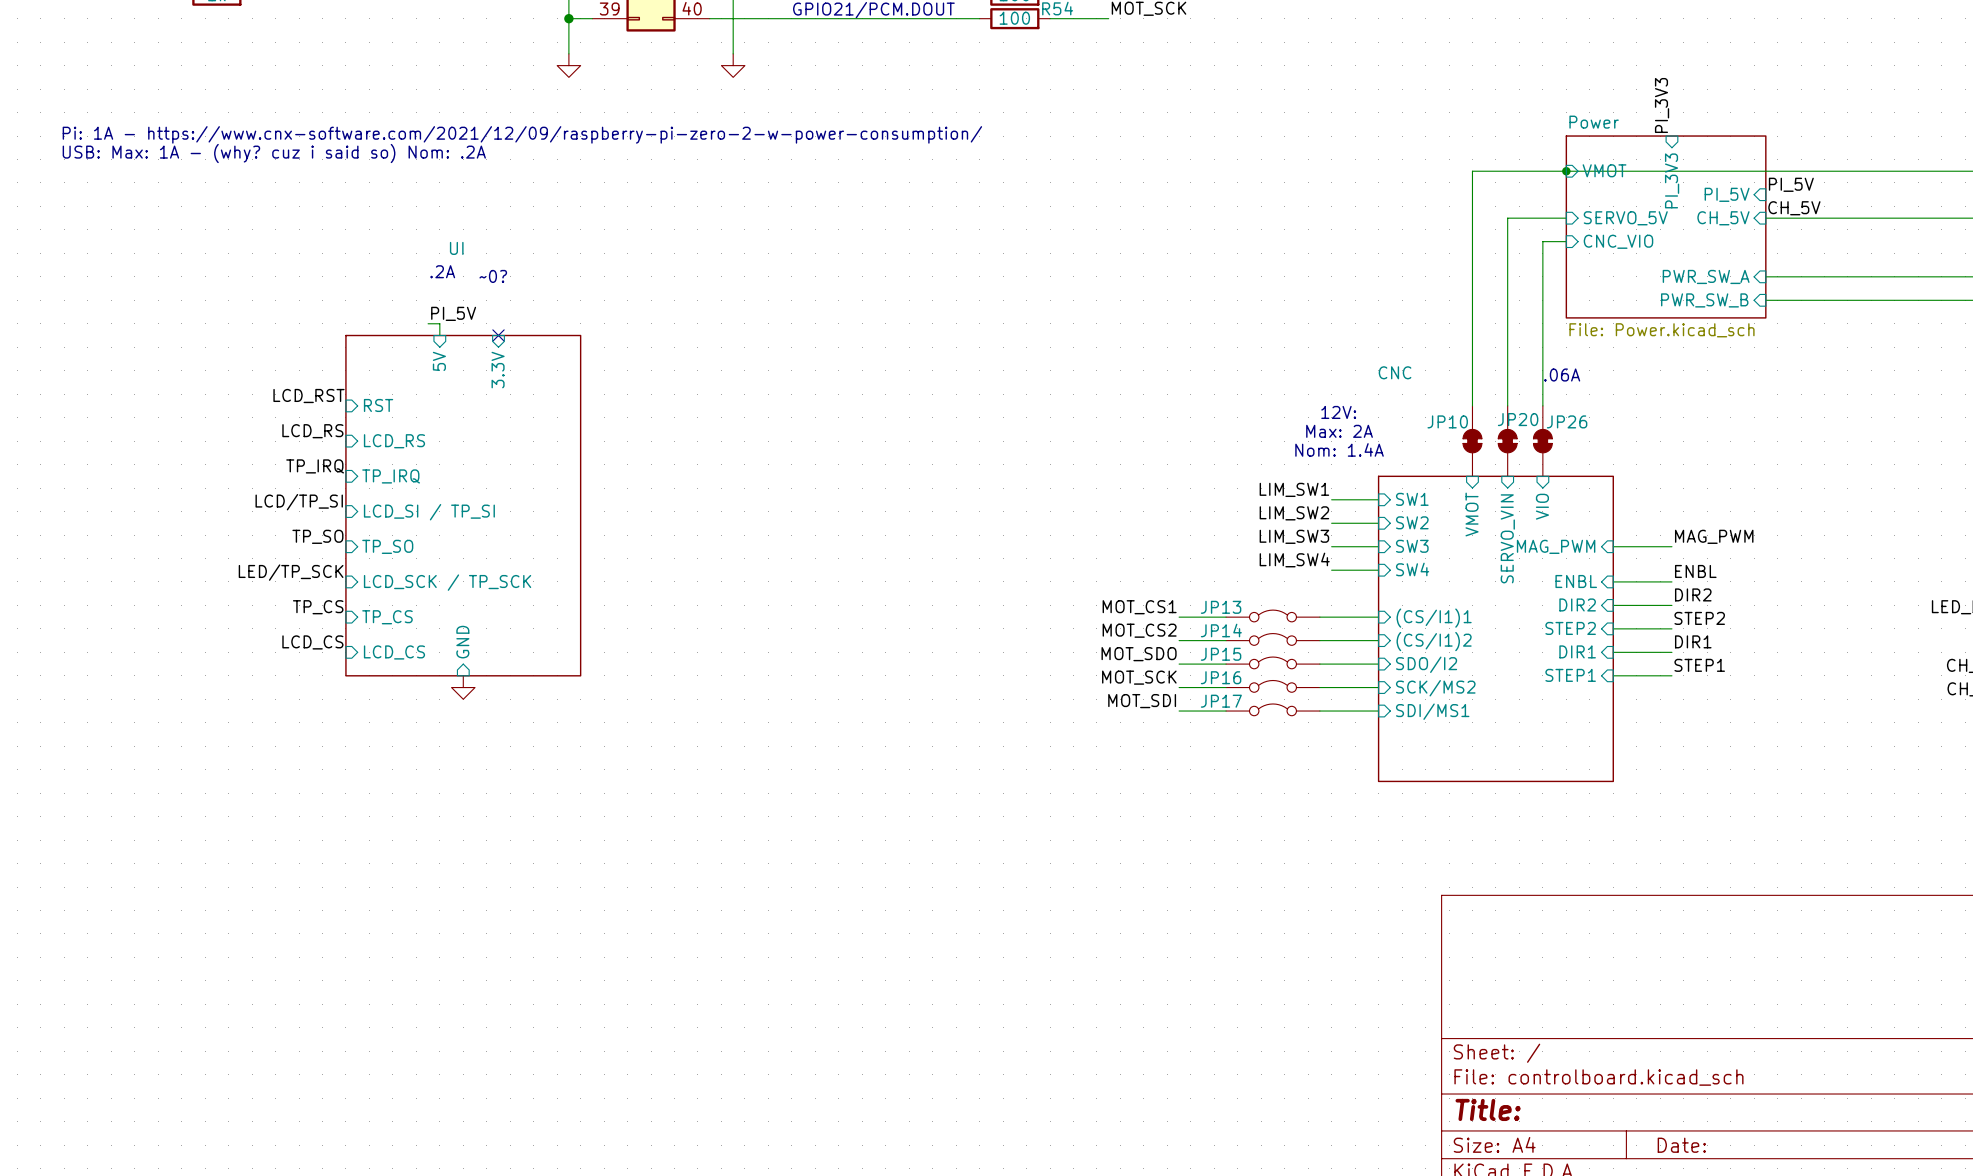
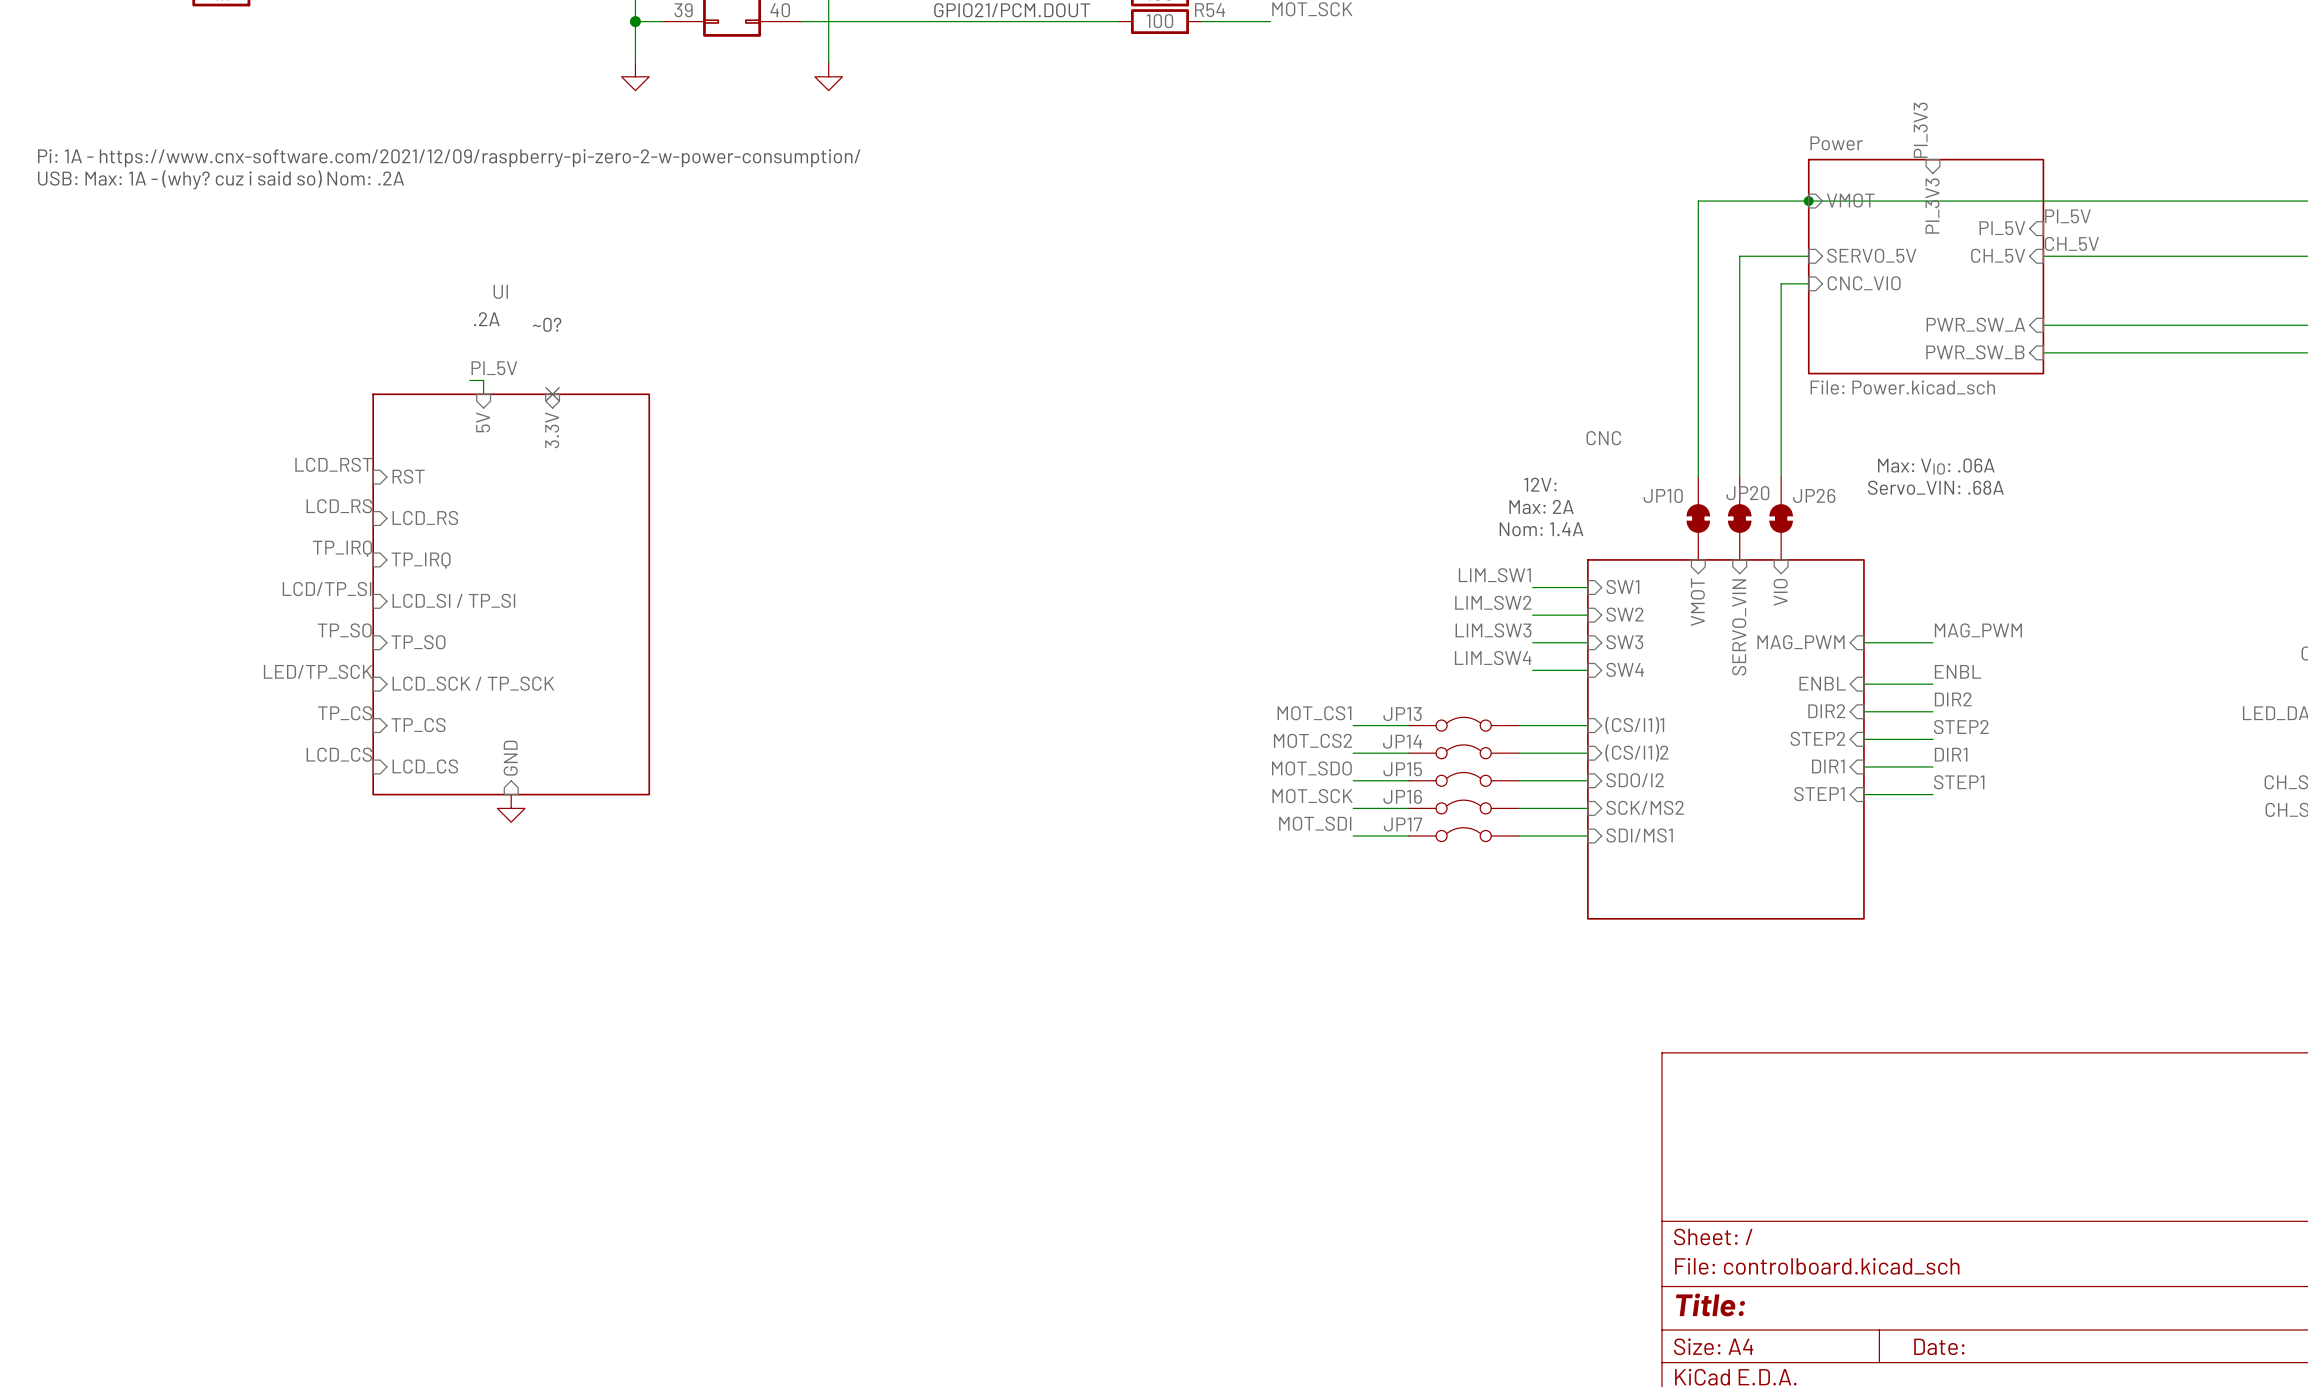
text: .06A (1562, 375) -> none
text: none -> Max: VIO: .06A (1936, 466)
text: none -> Servo_VIN: .68A (1935, 487)

